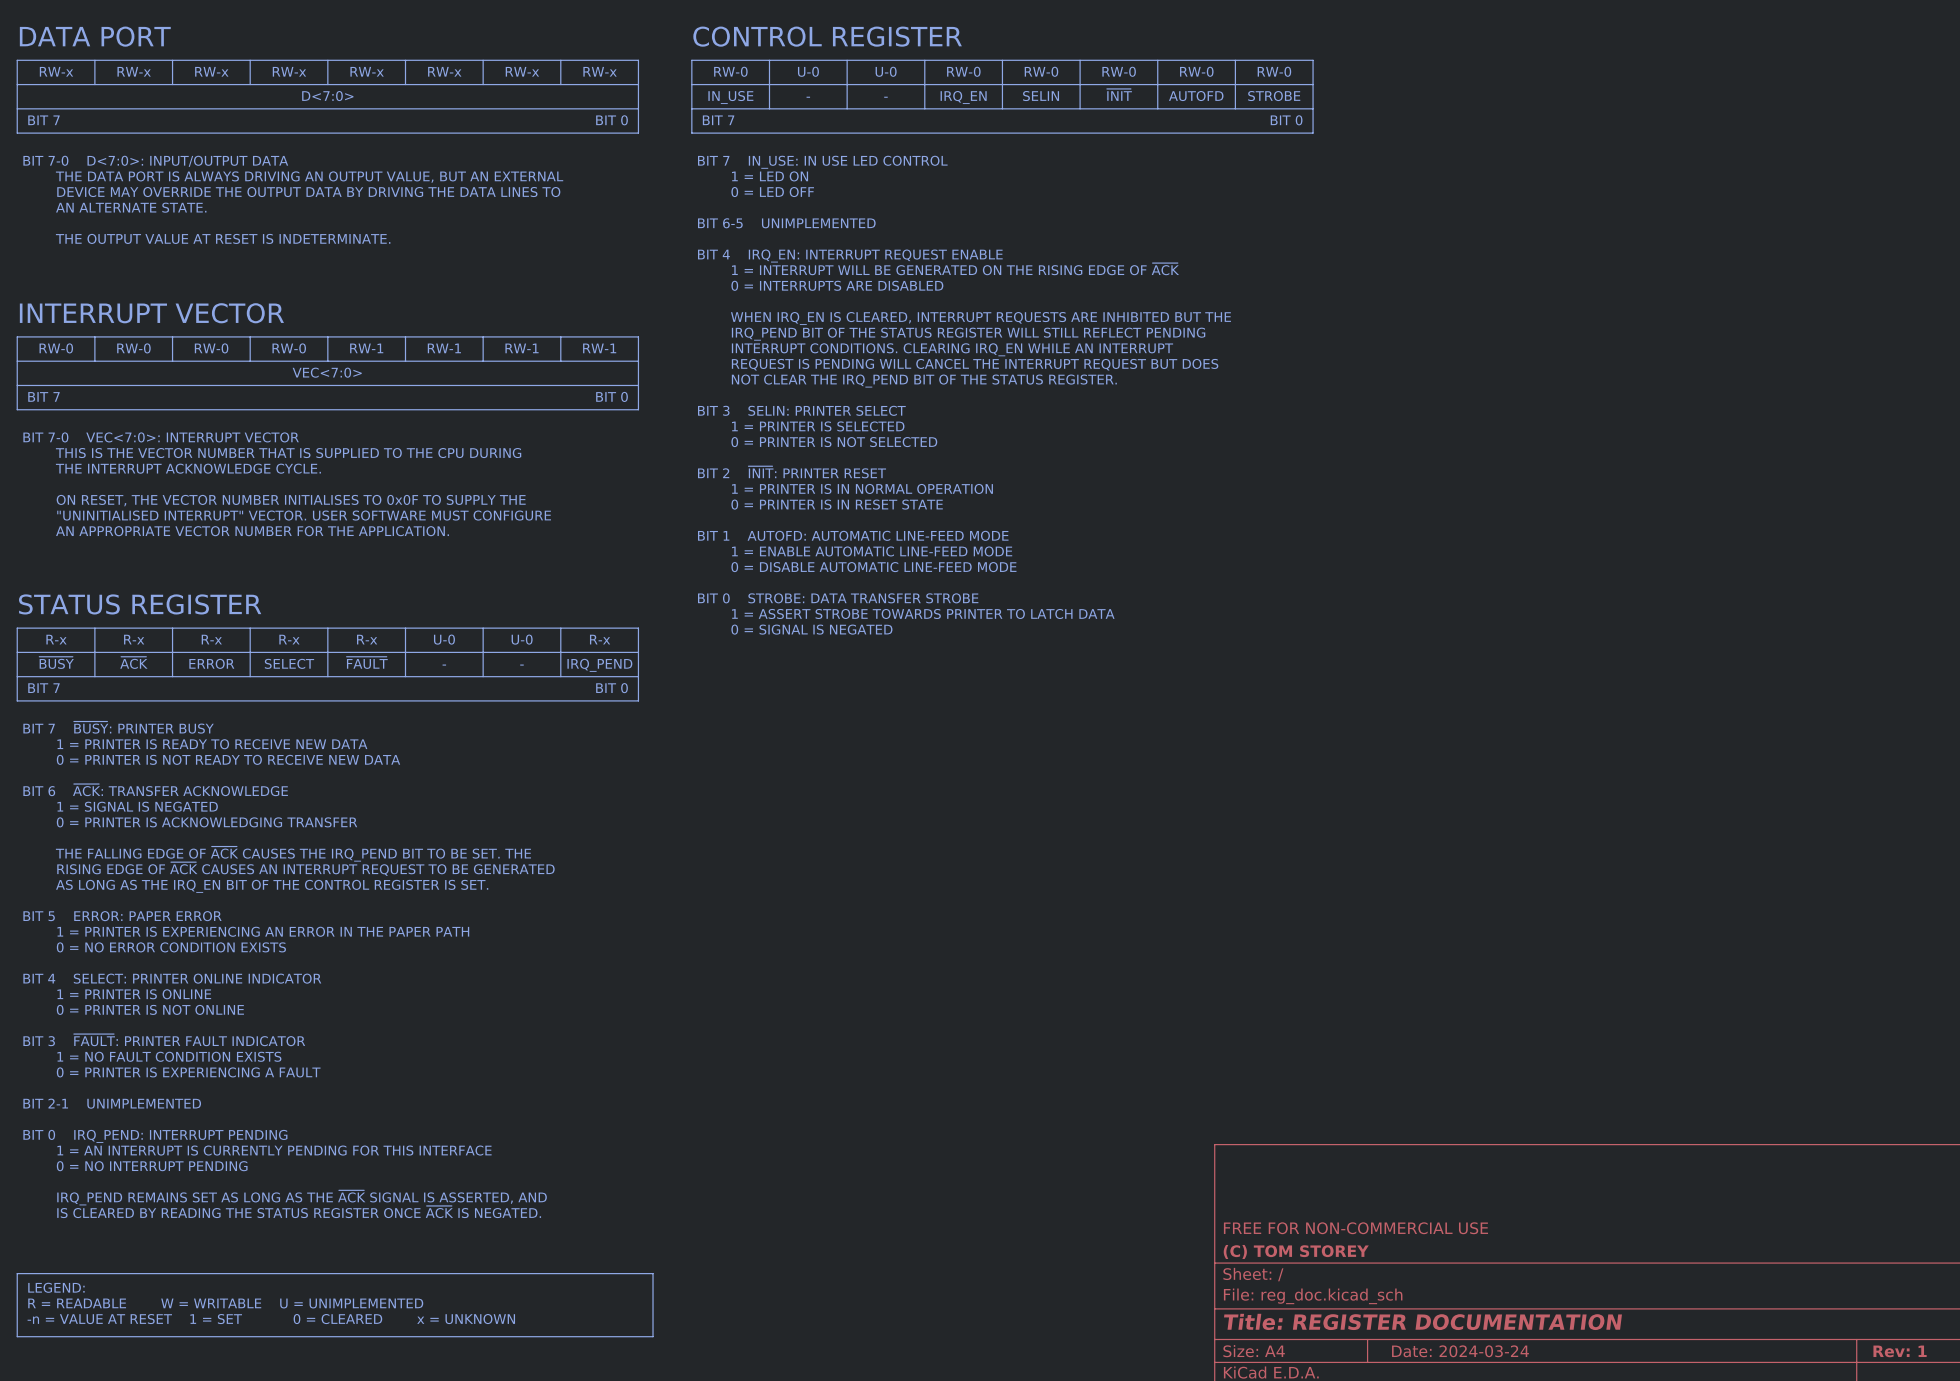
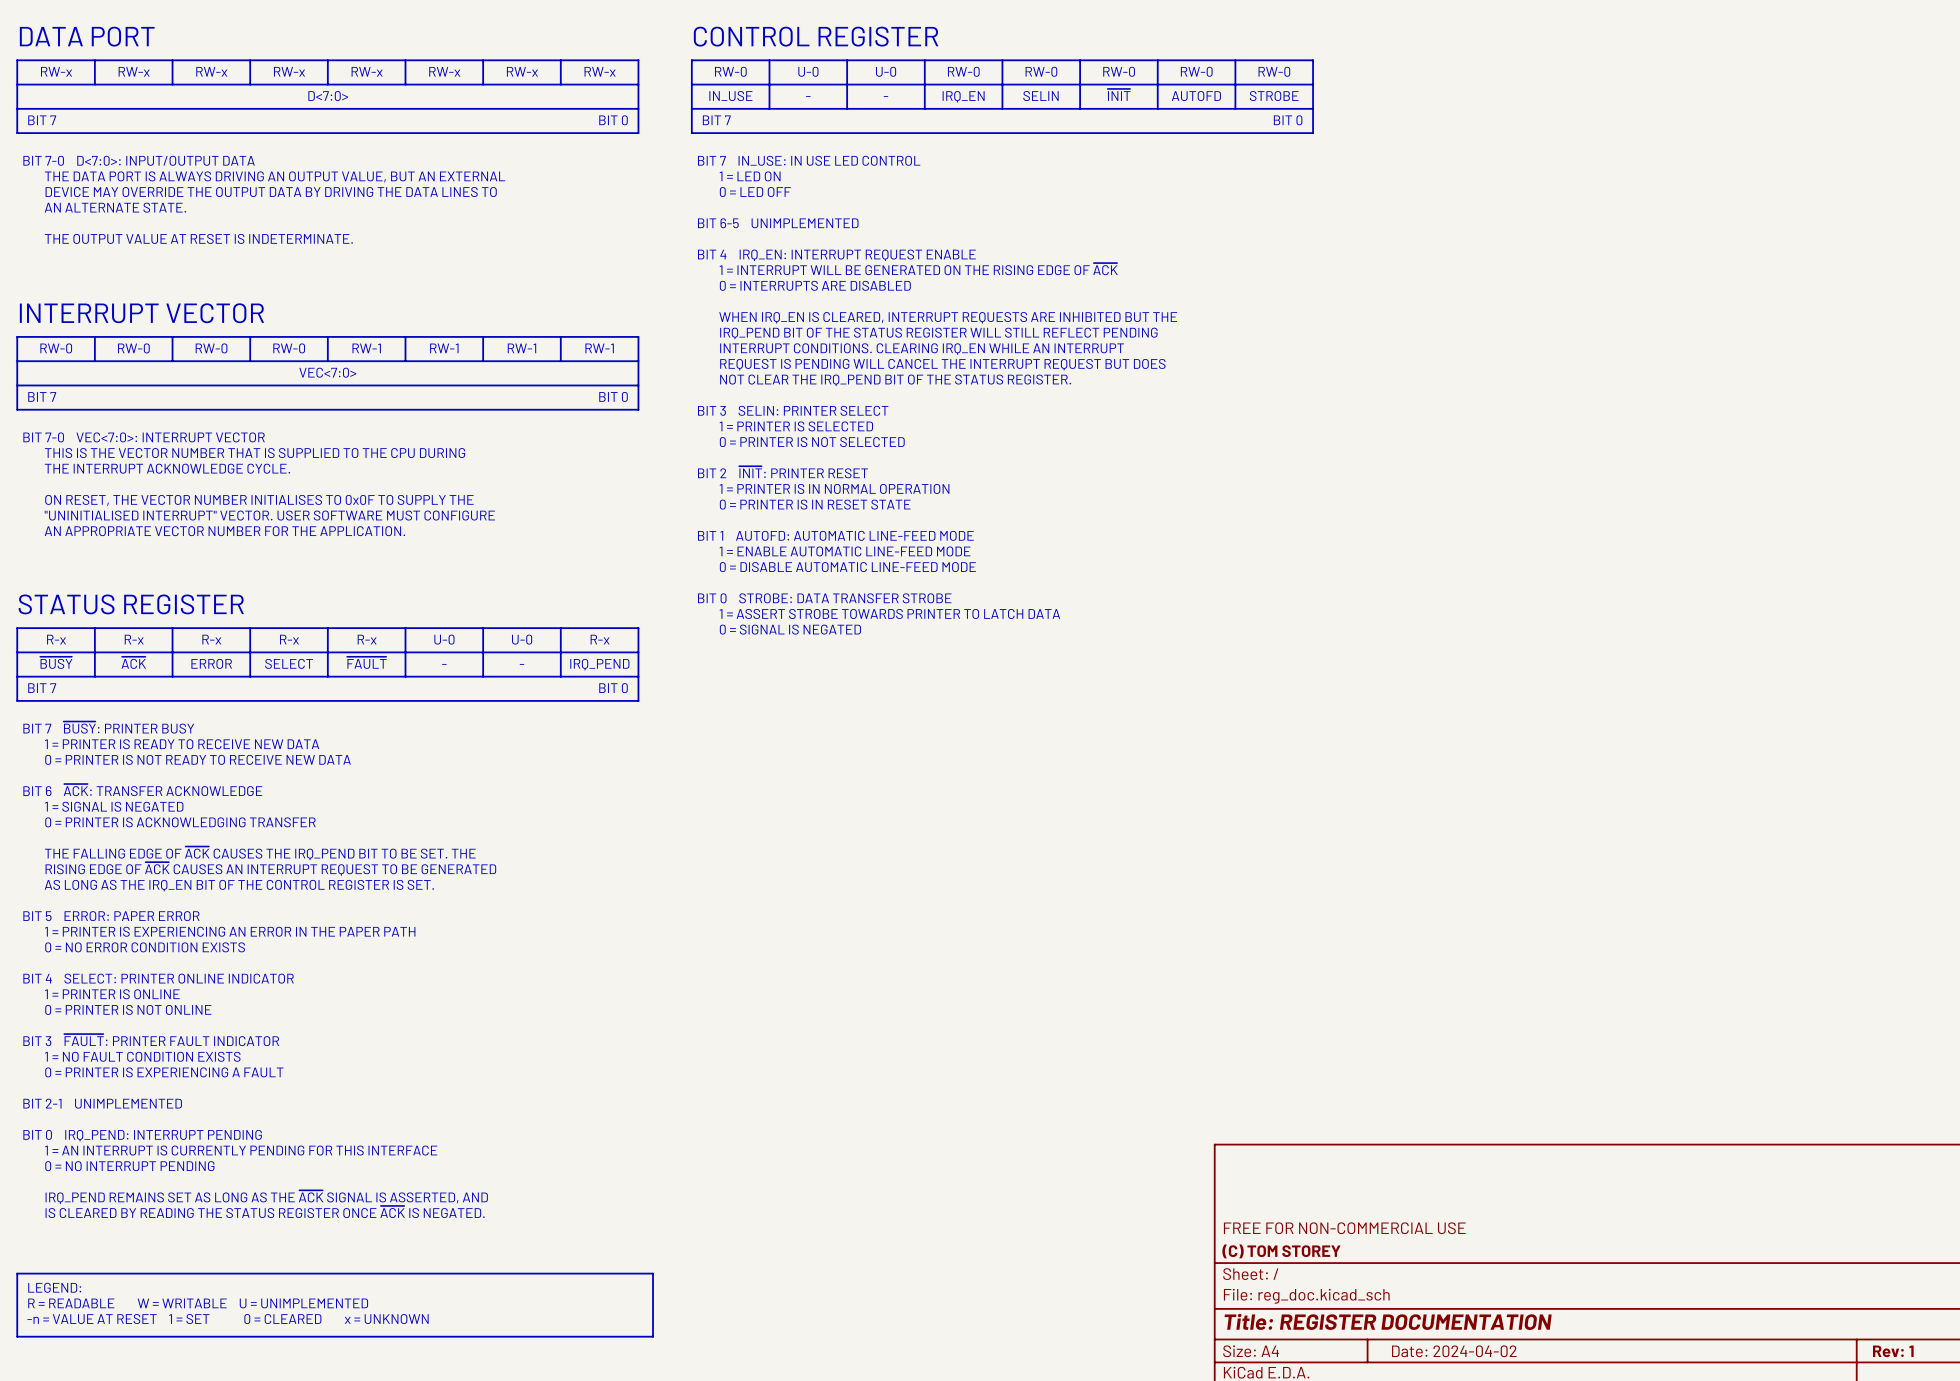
title block: Date: 2024-03-24 (1460, 1351) -> Date: 2024-04-02 (1454, 1351)

